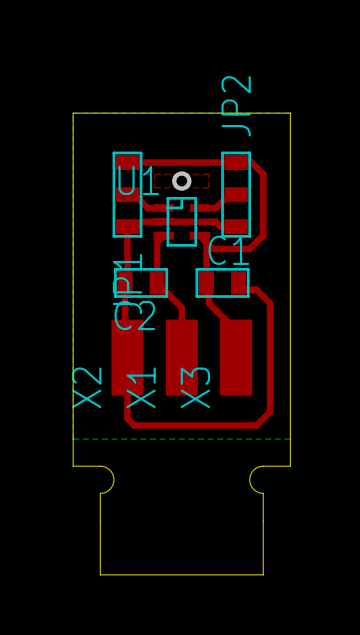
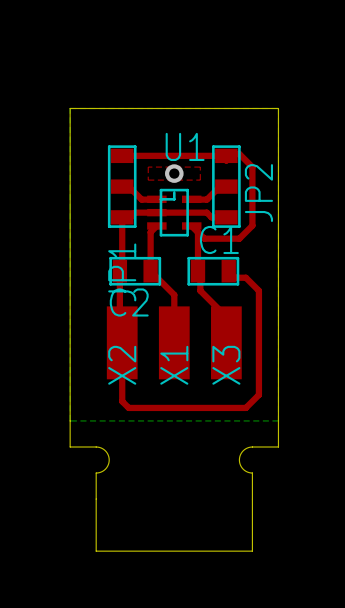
JP2 name position: JP2 (236, 106) -> JP2 (258, 193)
U1 name position: U1 (138, 180) -> U1 (185, 146)
X2 name position: X2 (86, 387) -> X2 (122, 365)
X1 name position: X1 (141, 387) -> X1 (174, 365)
X3 name position: X3 (195, 387) -> X3 (226, 365)

